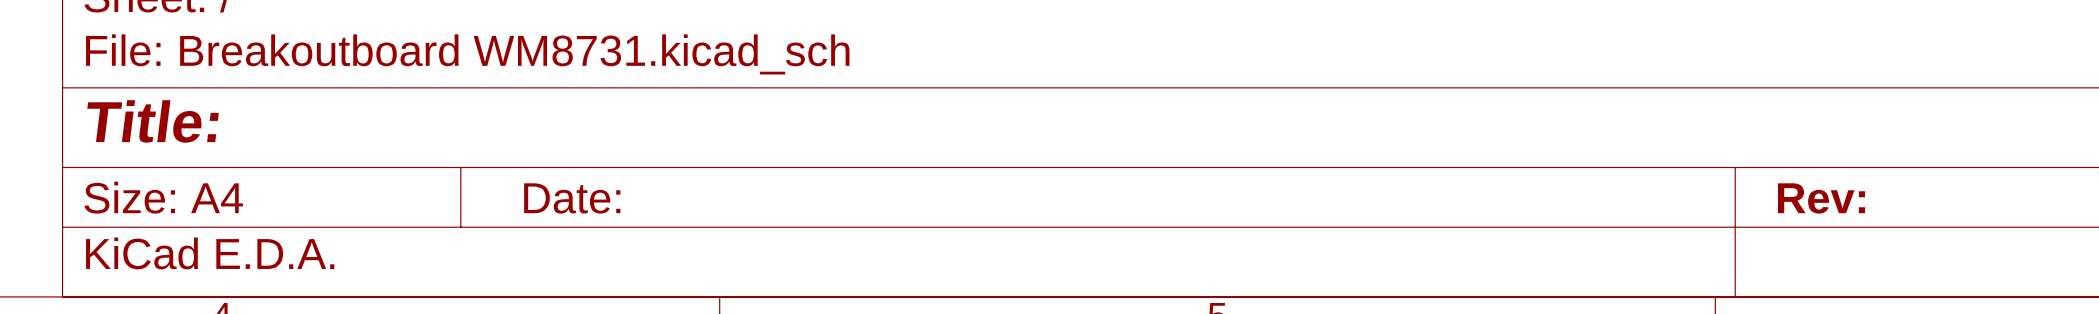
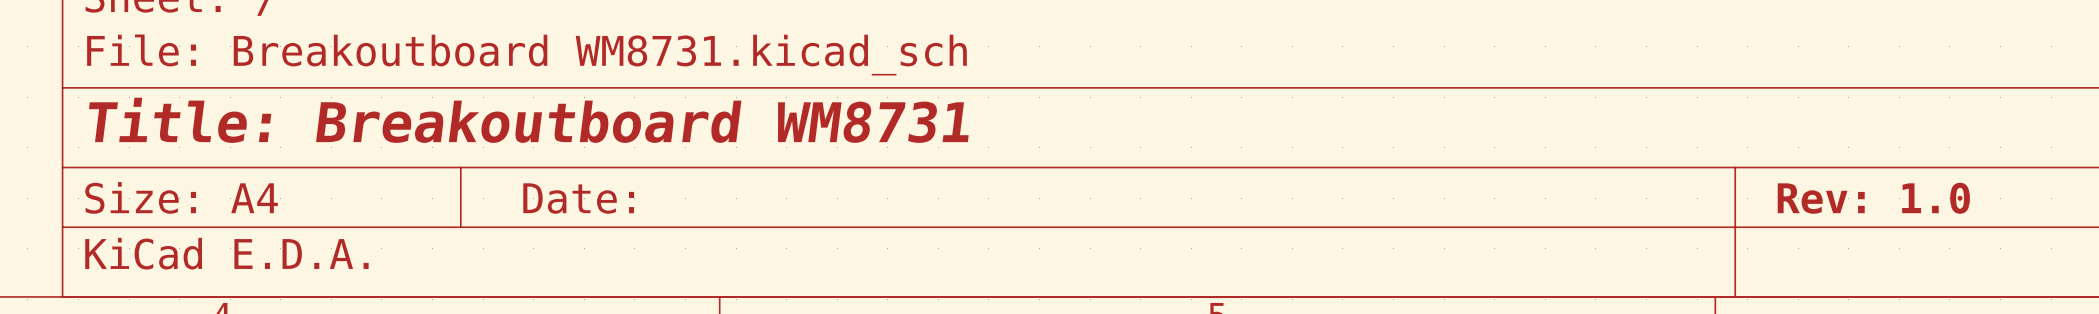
title block: Title: (153, 121) -> Title: Breakoutboard WM8731 (528, 120)
title block: Rev: (1821, 198) -> Rev: 1.0 (1873, 198)

